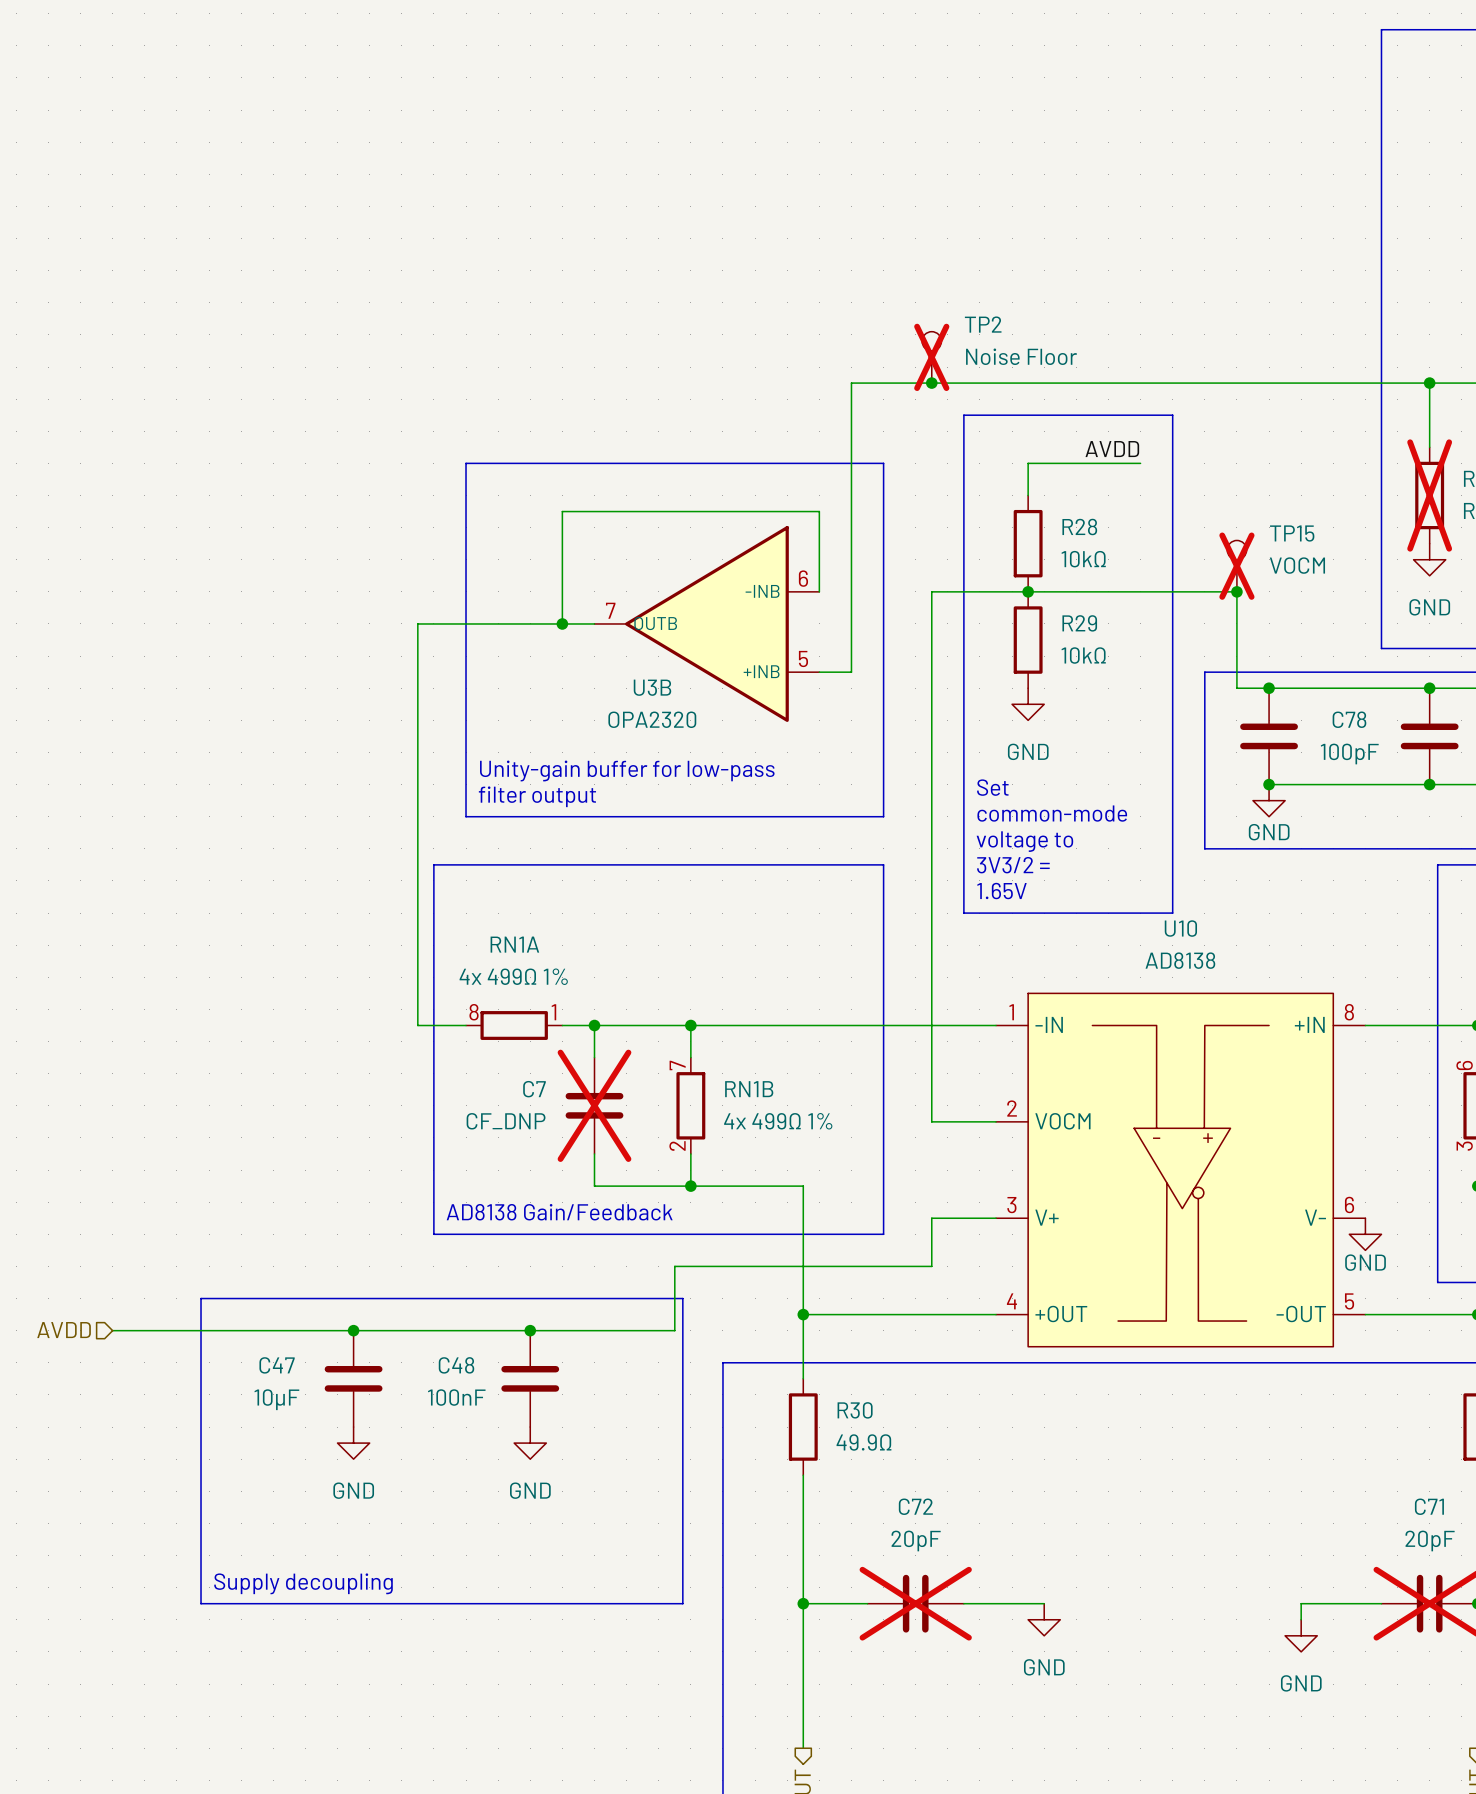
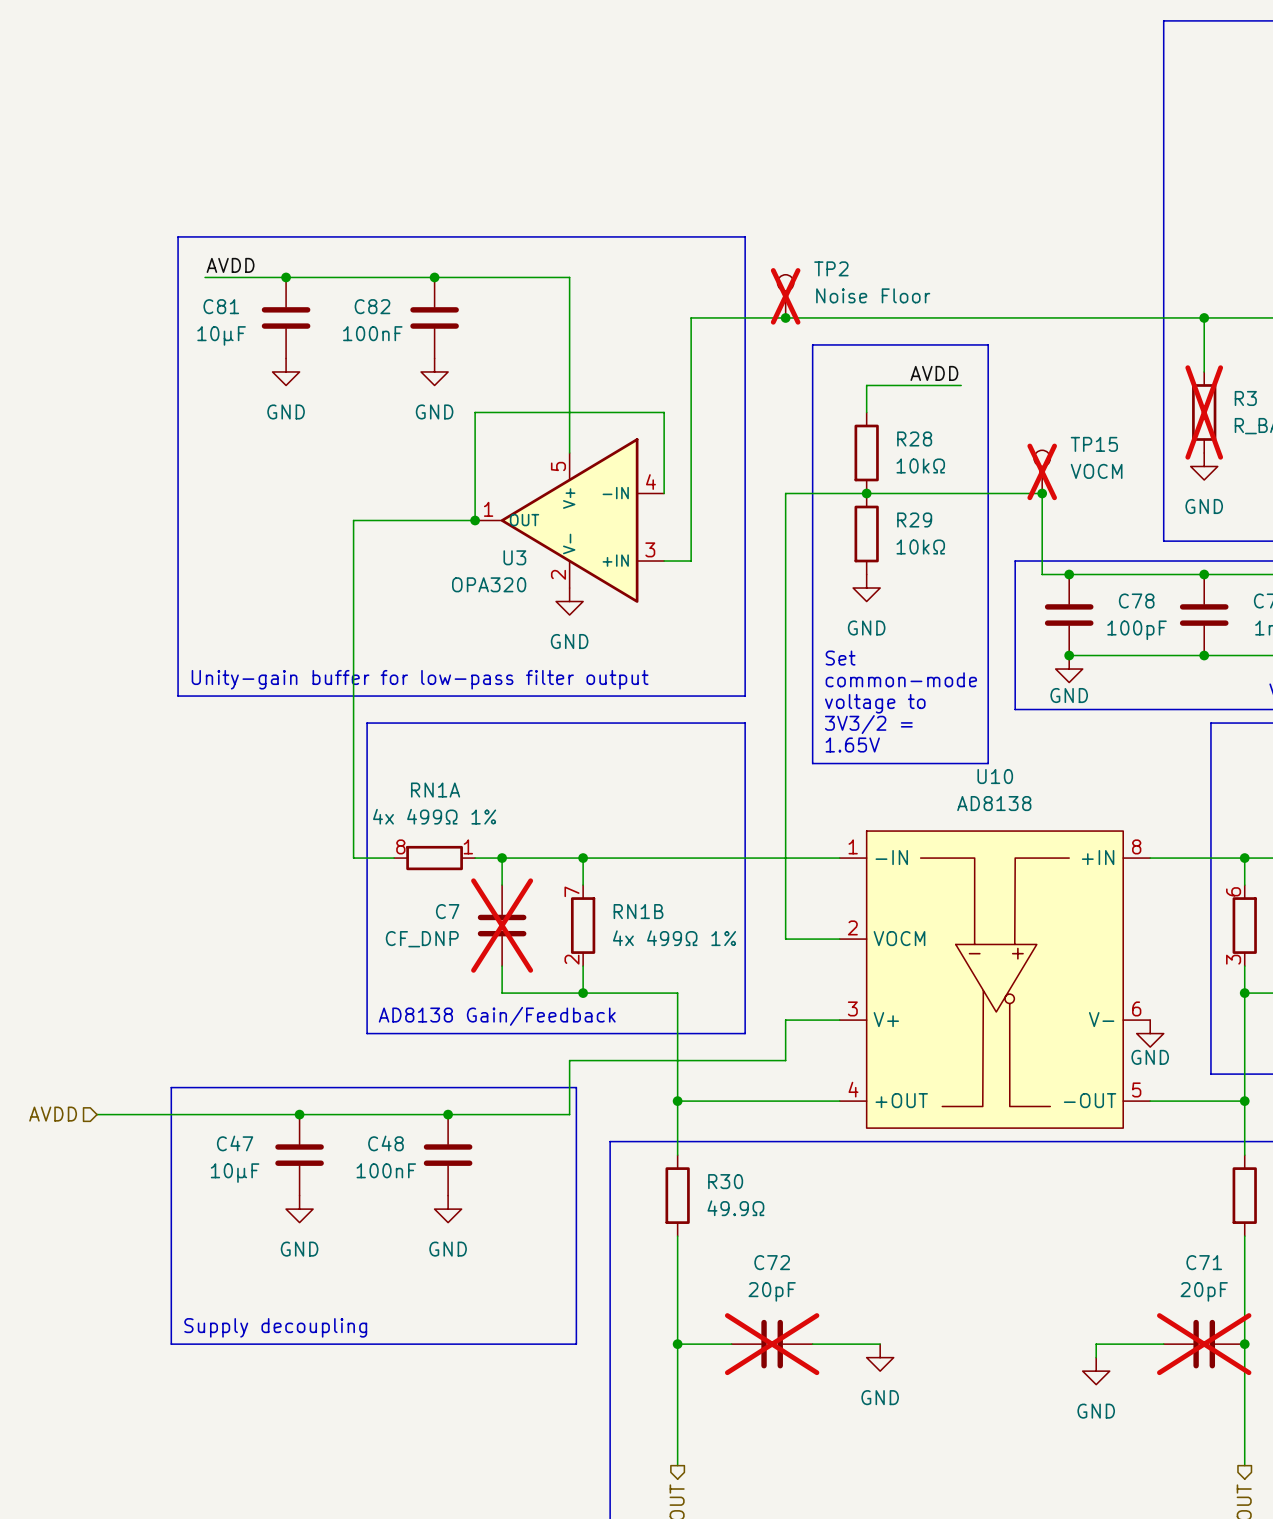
label: none -> AVDD (230, 265)
wire: none -> (205, 277) (569, 277) (569, 452)
junction: none -> (286, 277)
junction: none -> (434, 277)
C81: none -> 10µF (286, 317)
C82: none -> 100nF (434, 317)
wire: (851, 383) (851, 672) (819, 672) -> (718, 317) (691, 317) (691, 425)
power symbol: none -> GND (286, 371)
power symbol: none -> GND (434, 371)
line: (883, 463) (466, 463) (466, 816) (883, 816) -> (745, 385) (745, 236) (178, 236) (178, 696) (745, 696) (745, 682)
wire: (562, 511) (819, 511) -> (475, 425) (475, 412) (664, 412) (664, 493)
wire: none -> (691, 493) (691, 561) (664, 561)
U3: none -> OPA320 (569, 520)
U3B: OPA2320 (706, 623) -> none
power symbol: none -> GND (569, 601)
text: Unity-gain buffer for low-pass (627, 770) -> none
text: filter output (537, 796) -> none
text: none -> Unity-gain buffer for low-pass filter output (420, 679)

